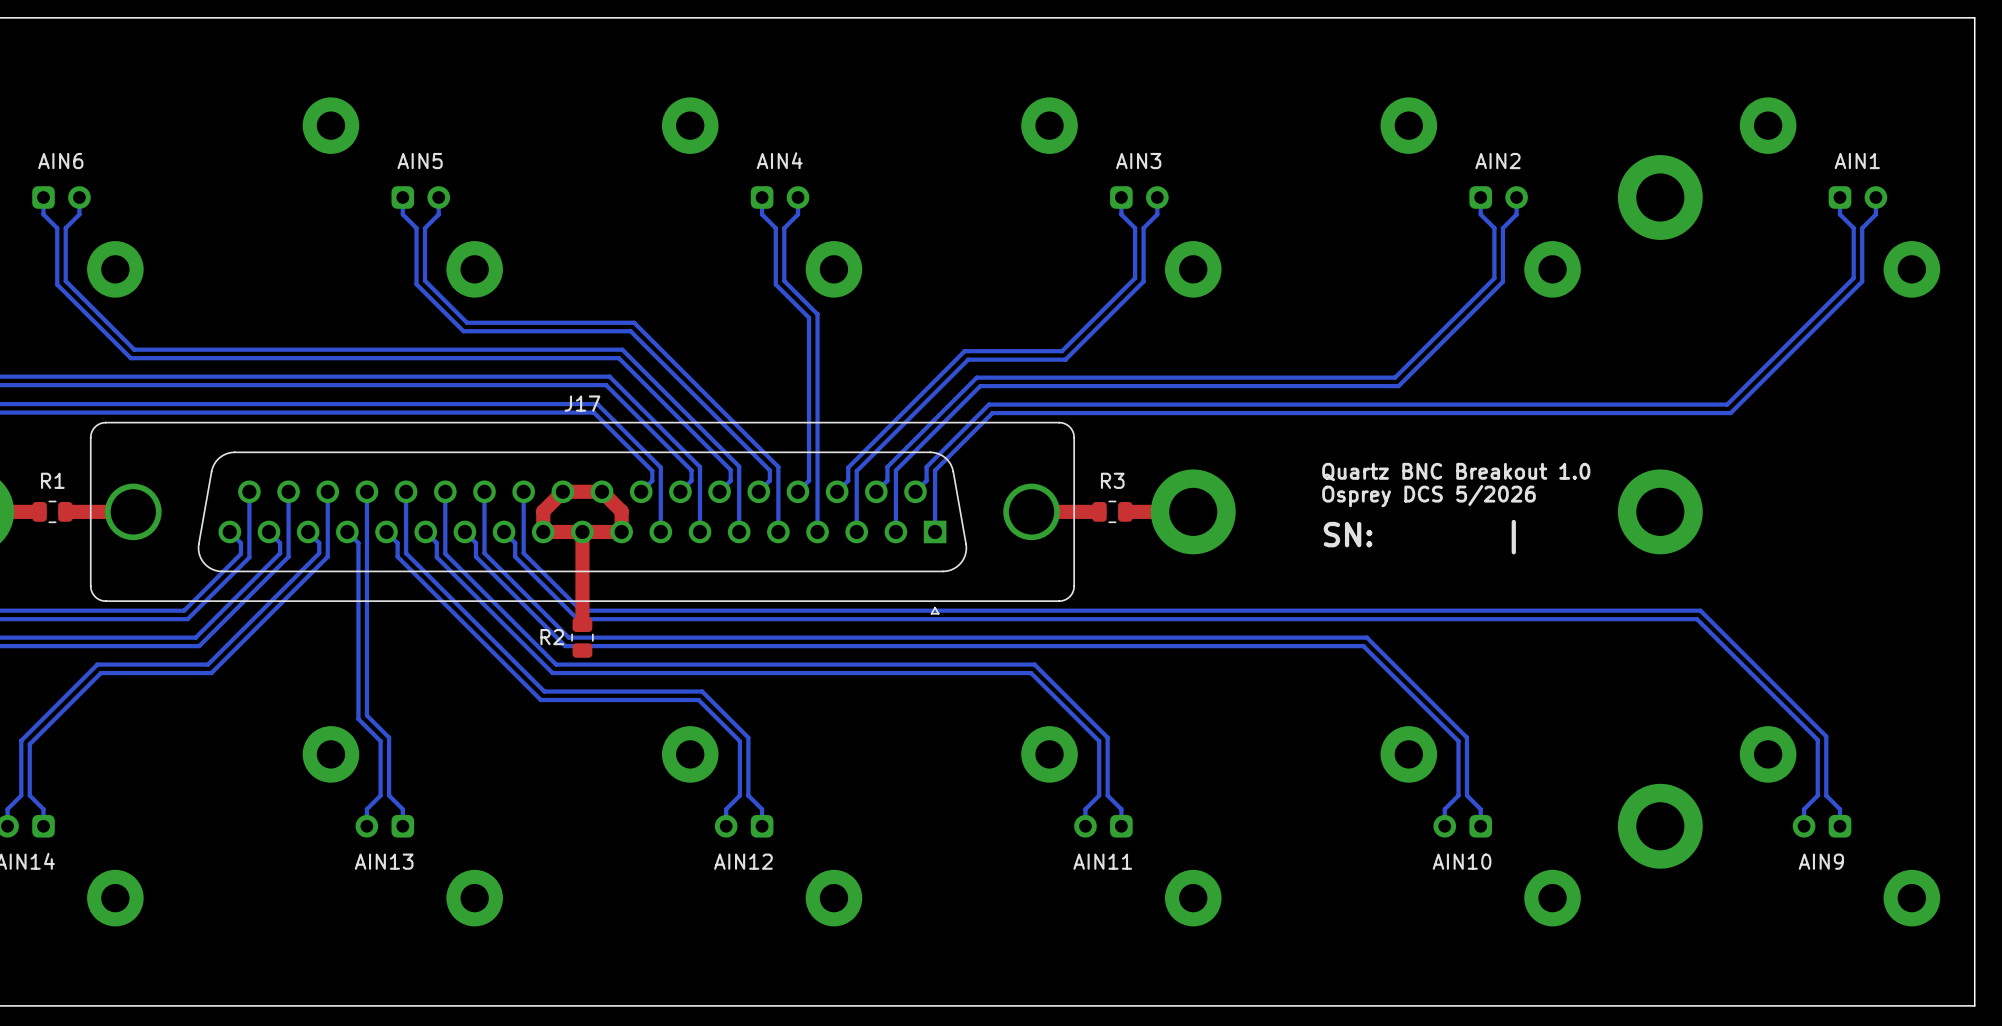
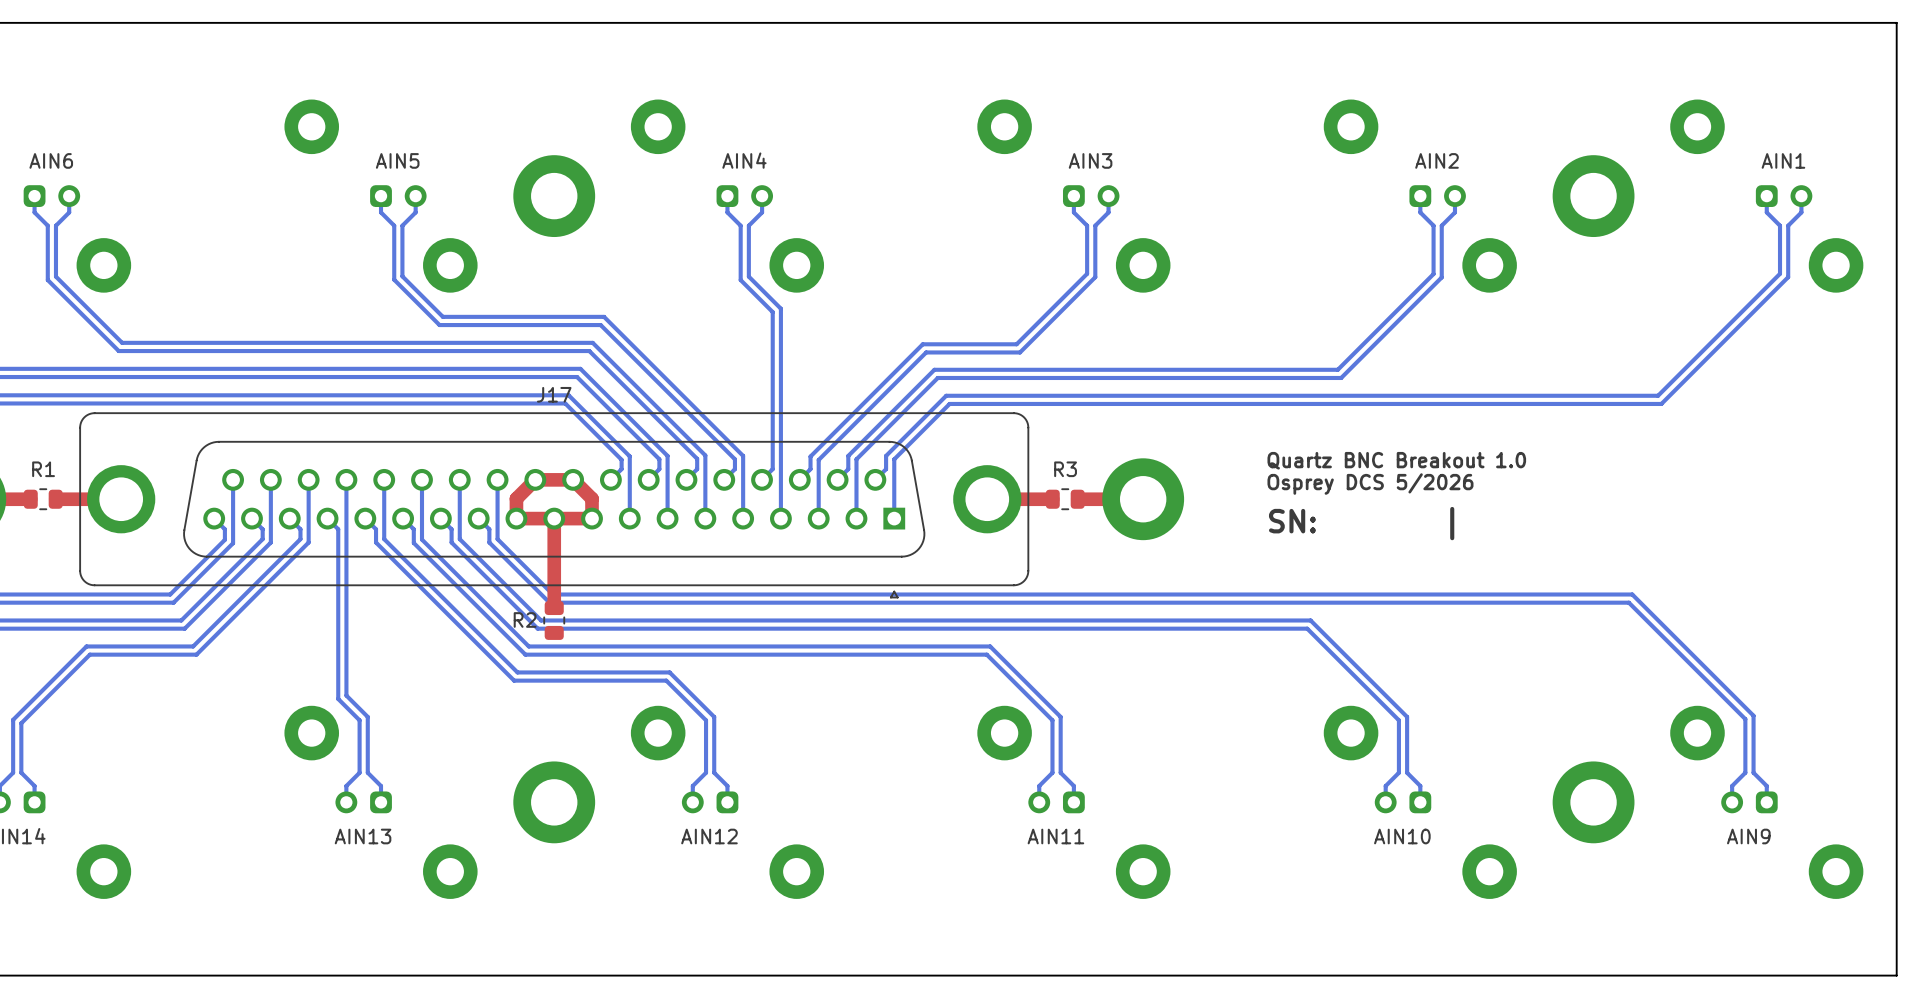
part: none -> (554, 196)
J17 footprint: [89, 421, 1076, 615] -> [79, 412, 1030, 599]
part: (1660, 511) -> none
part: none -> (554, 802)

